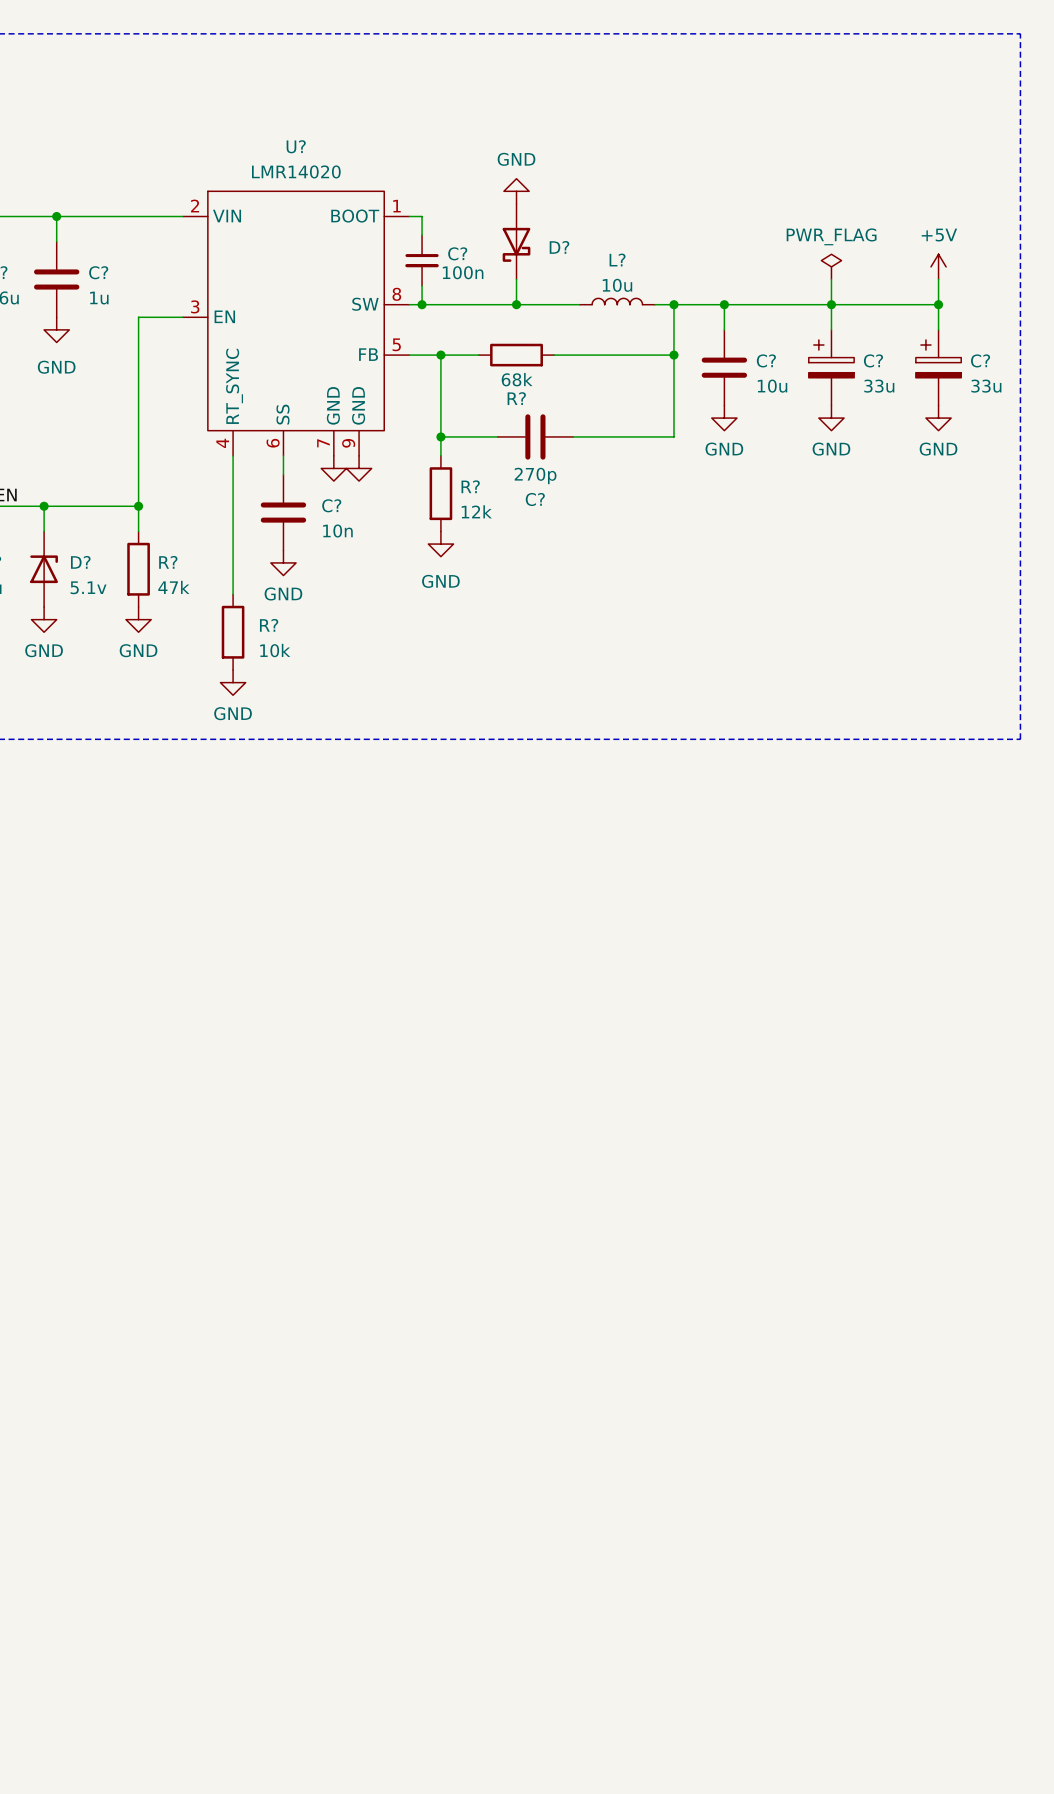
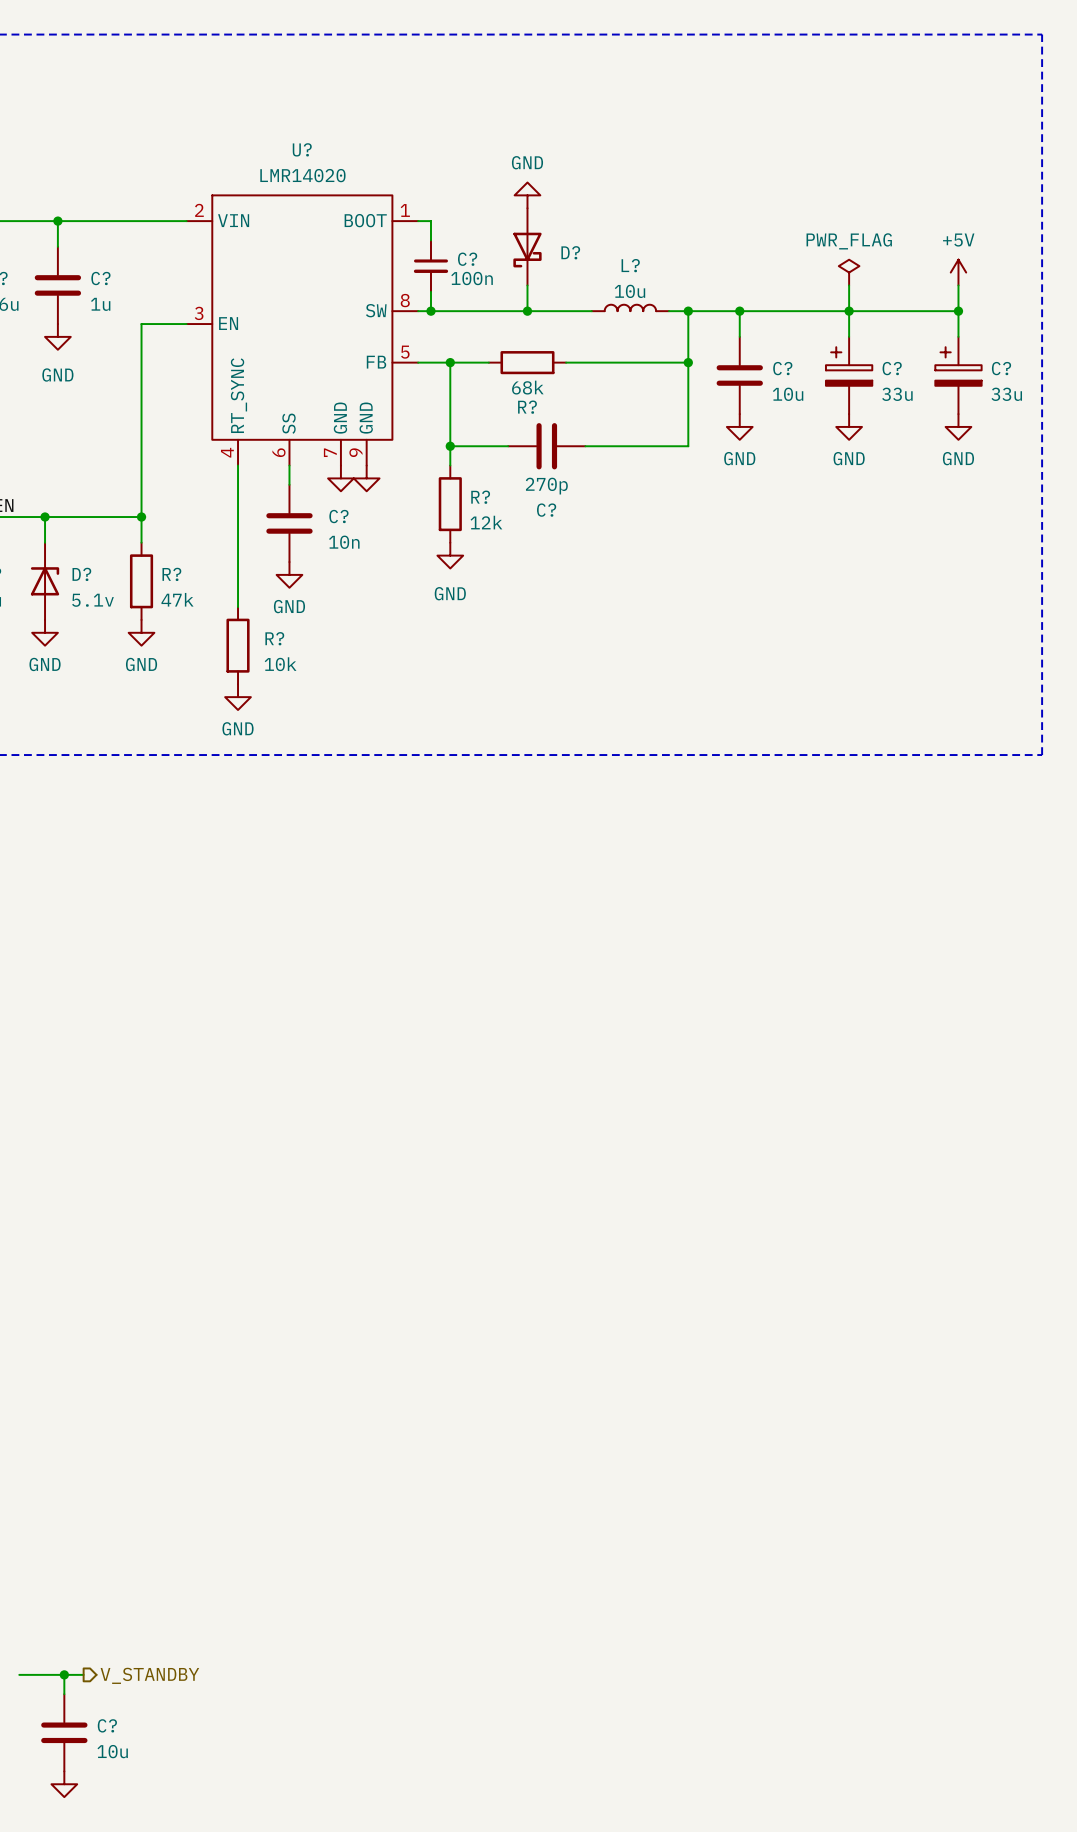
wire: none -> (19, 1674) (83, 1674)
wire: none -> (64, 1674) (64, 1694)
junction: none -> (64, 1674)
hierarchical label: none -> V_STANDBY (149, 1675)
C?: none -> 10u (64, 1732)
power symbol: none -> (64, 1784)

